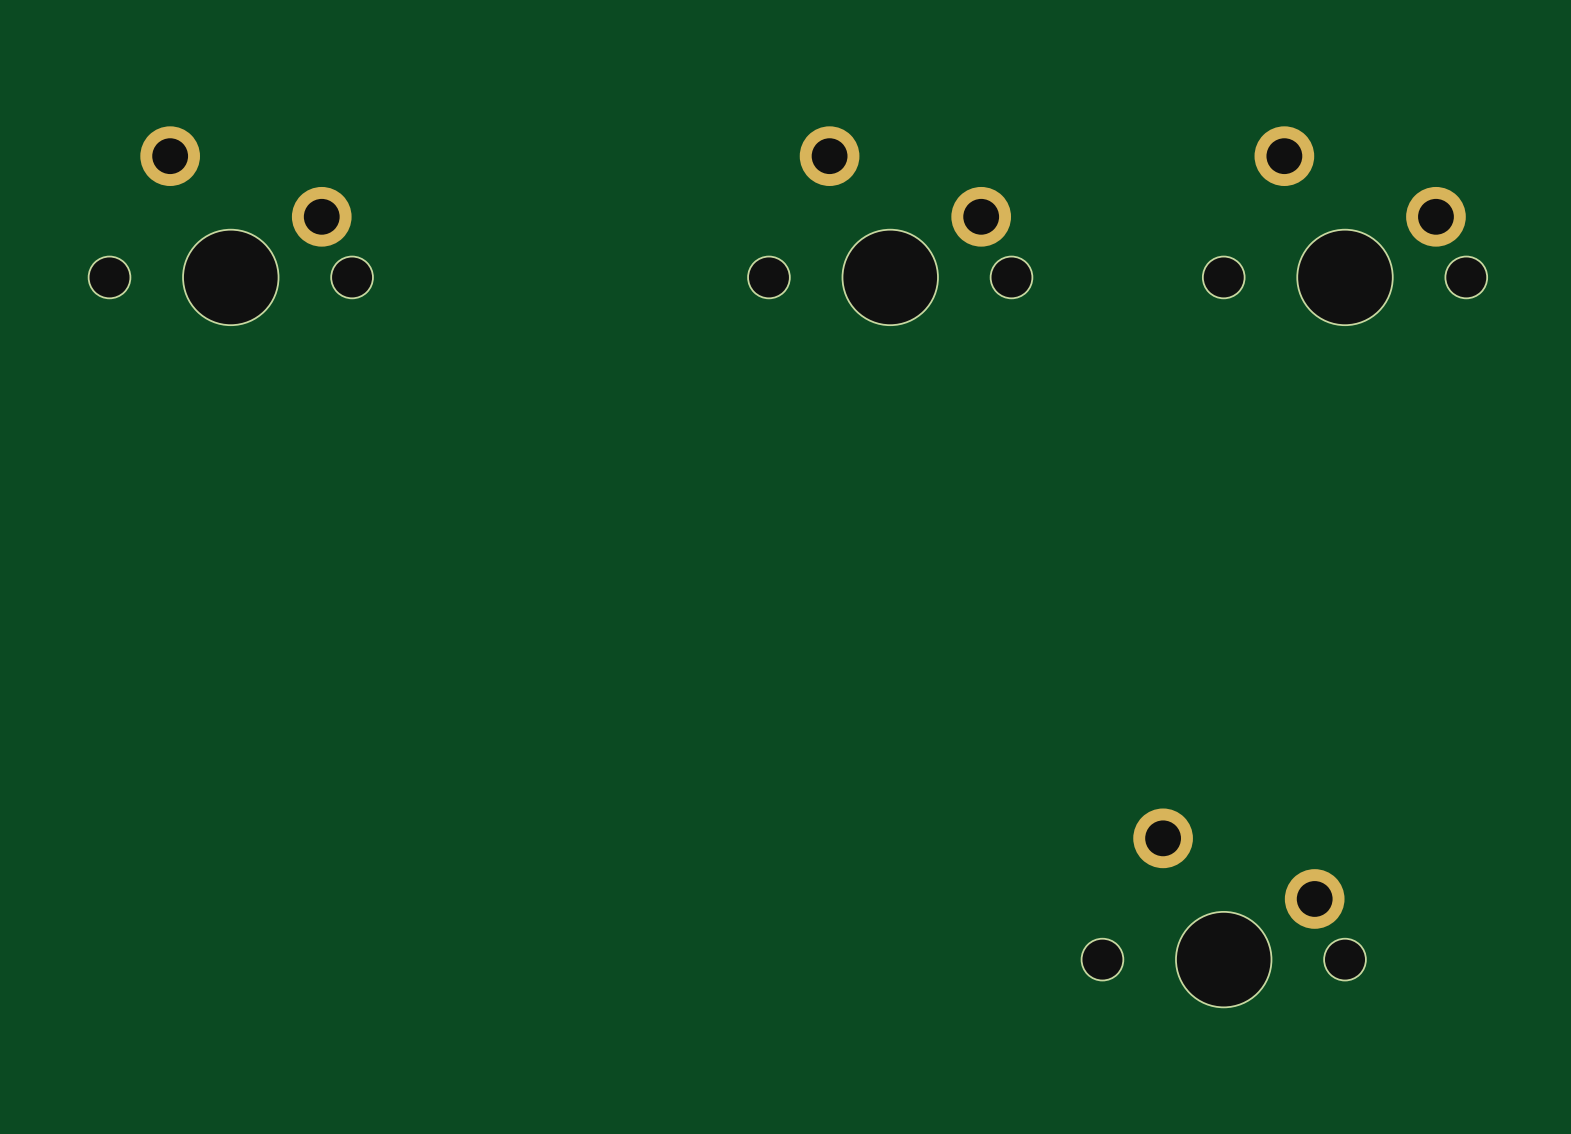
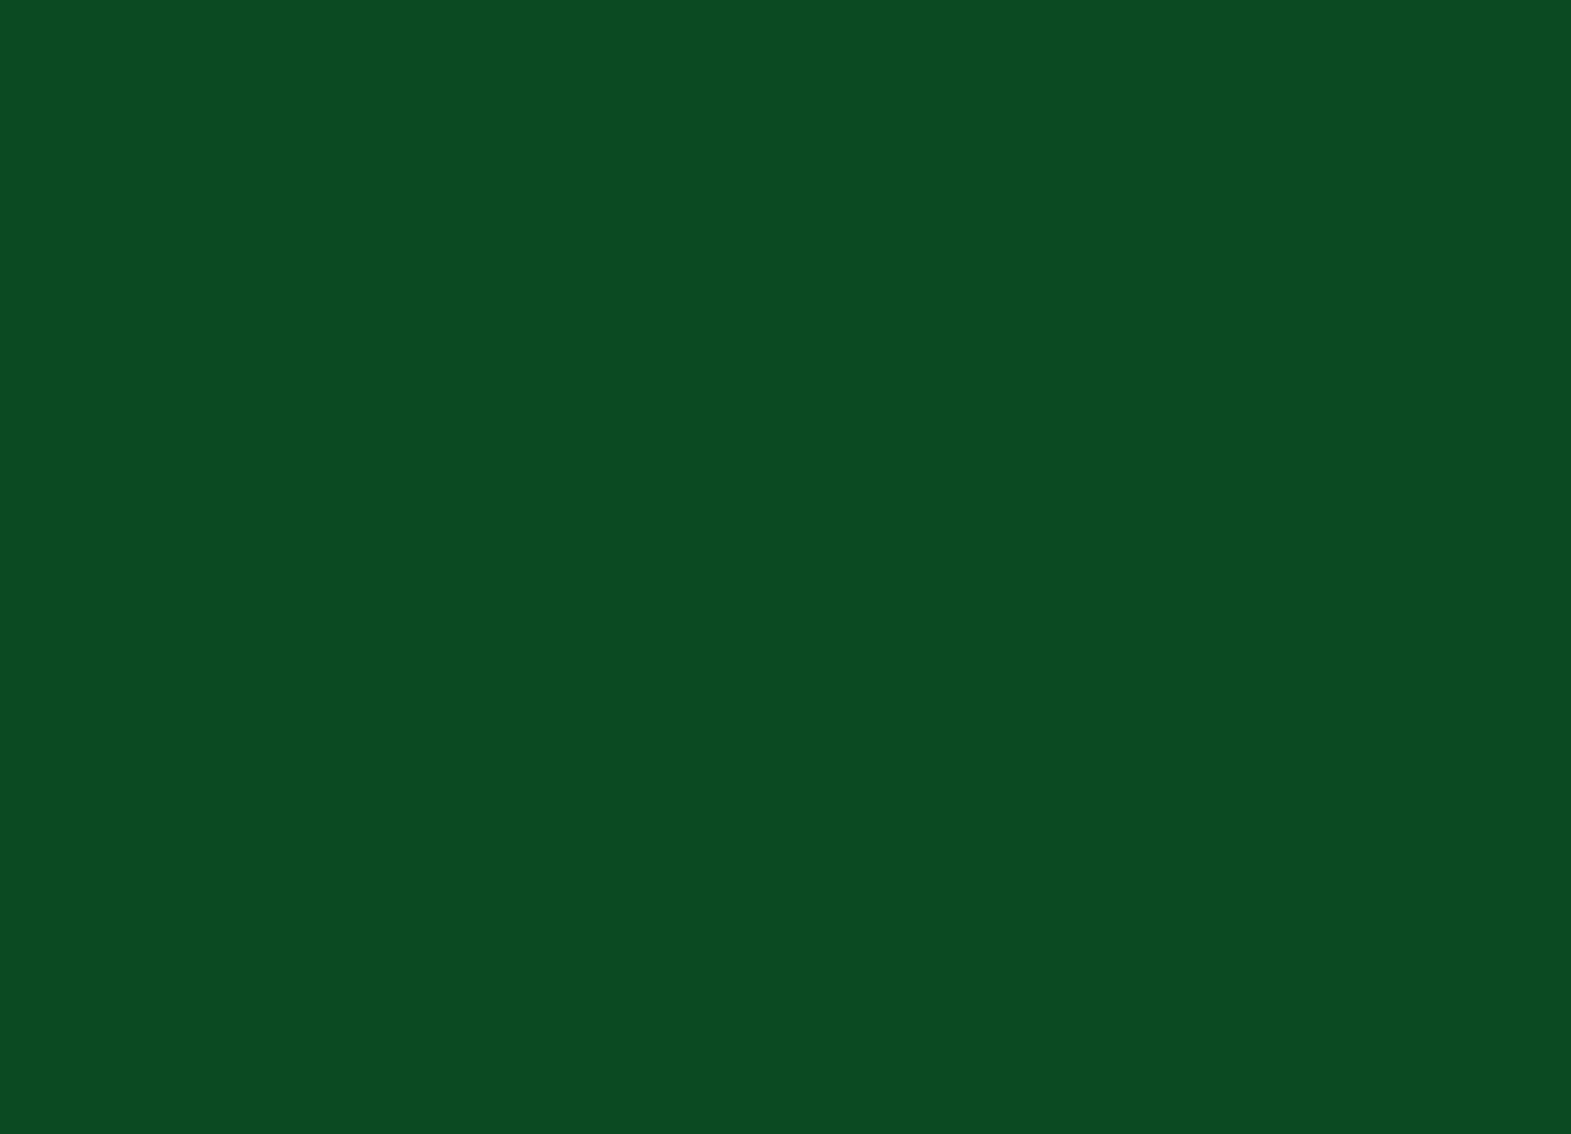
part: (230, 225) -> none
part: (890, 225) -> none
part: (1345, 225) -> none
part: (1223, 907) -> none

